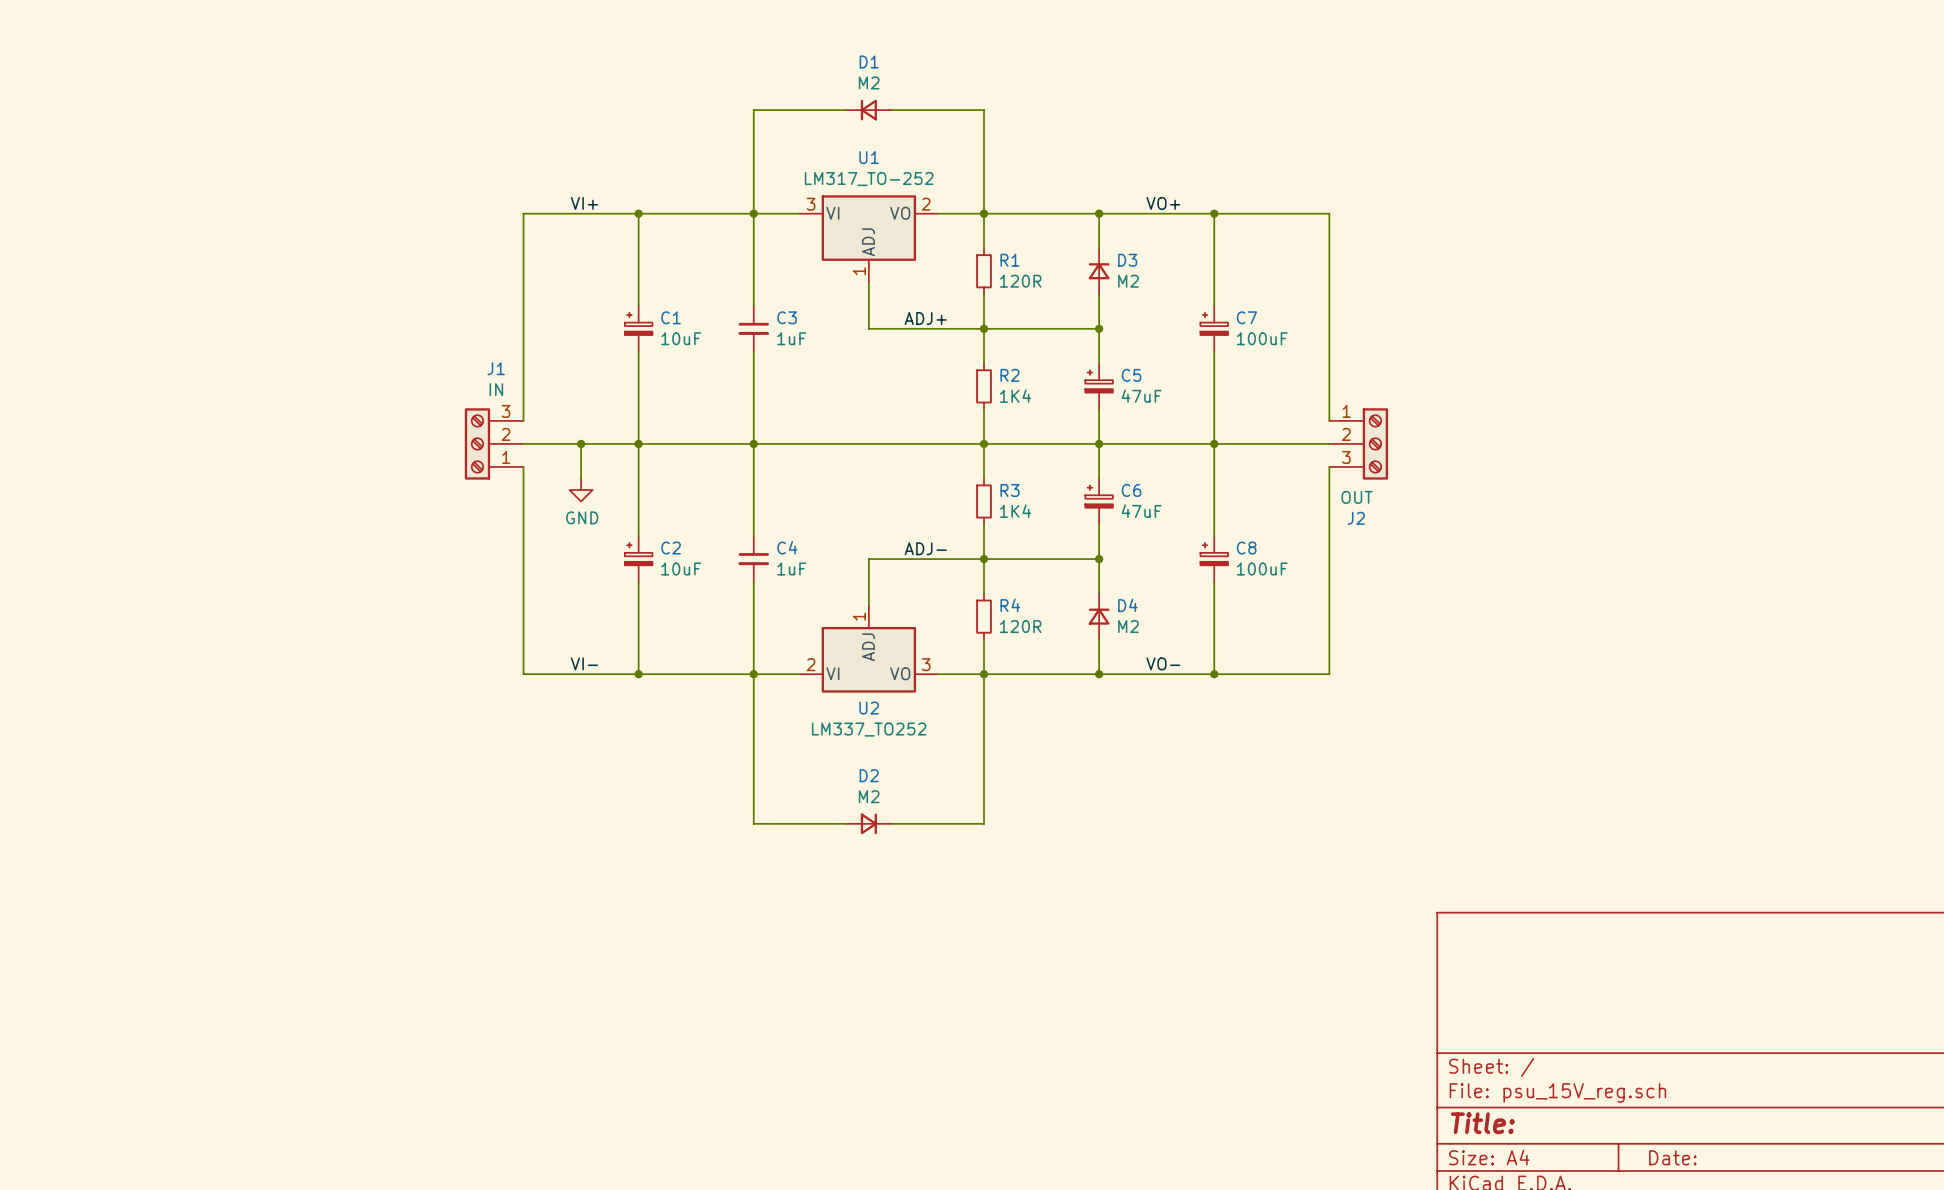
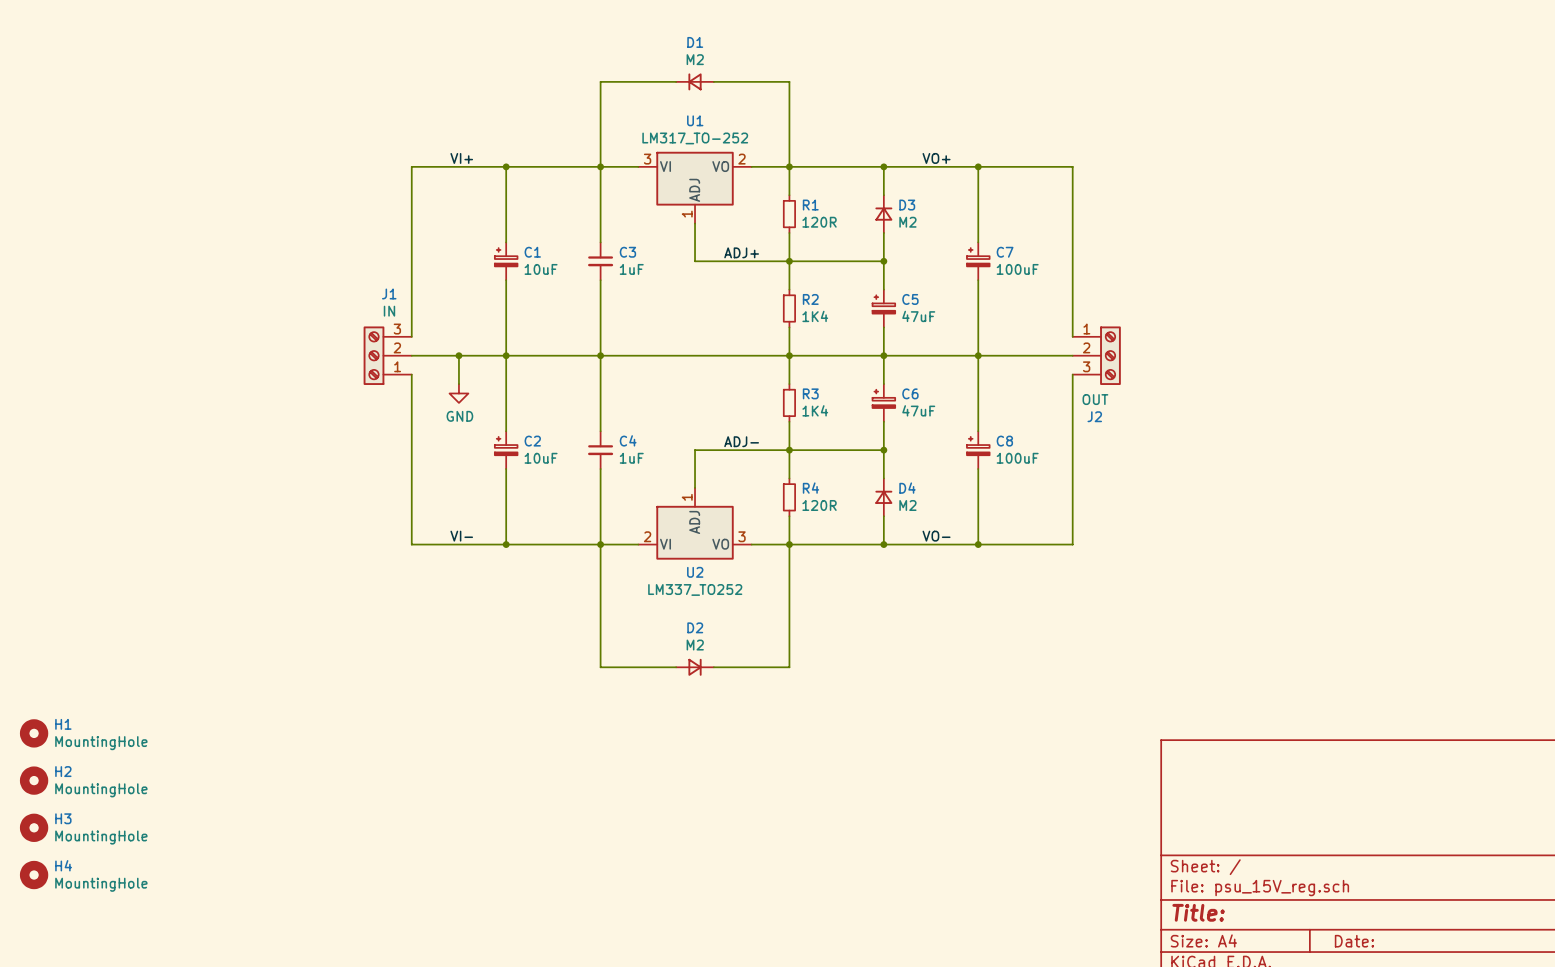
H1: none -> MountingHole (34, 733)
H2: none -> MountingHole (34, 780)
H3: none -> MountingHole (34, 827)
H4: none -> MountingHole (34, 875)

